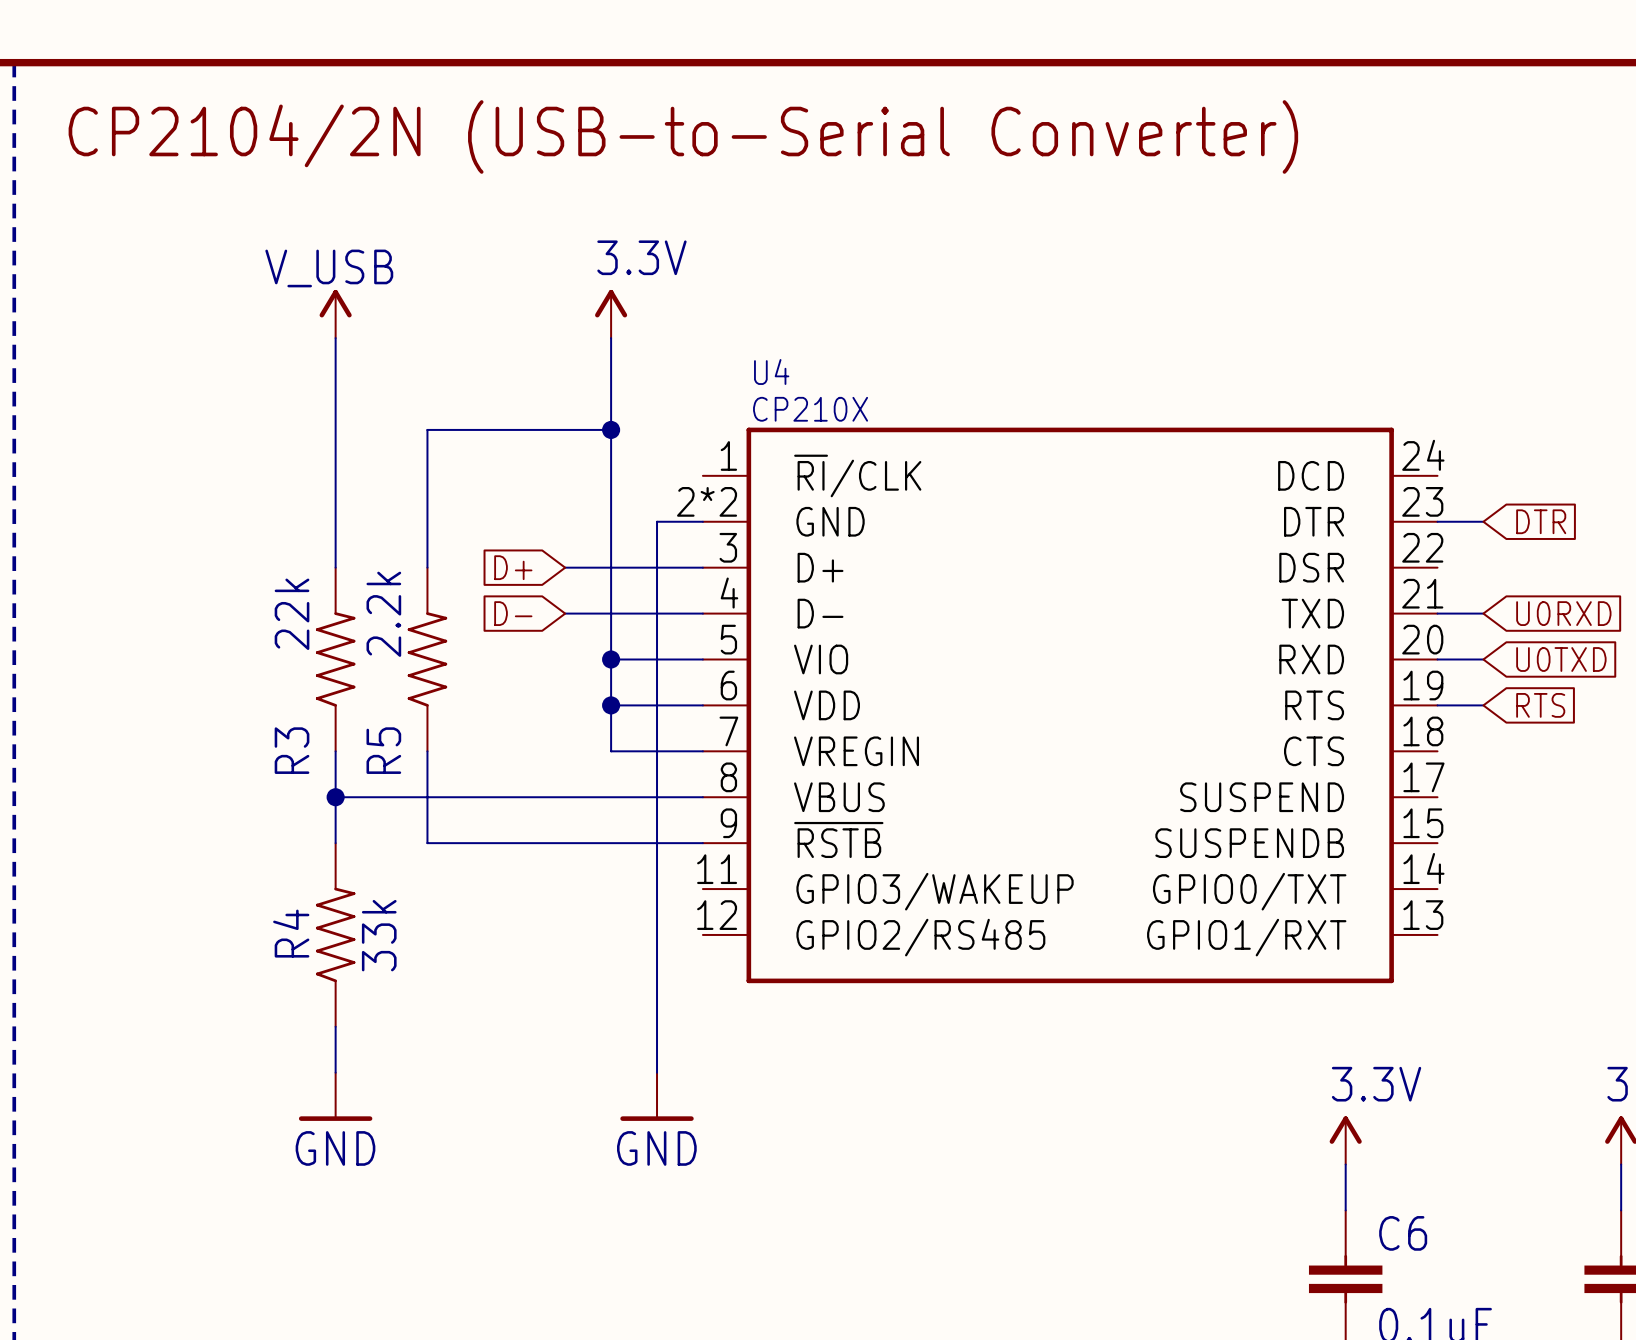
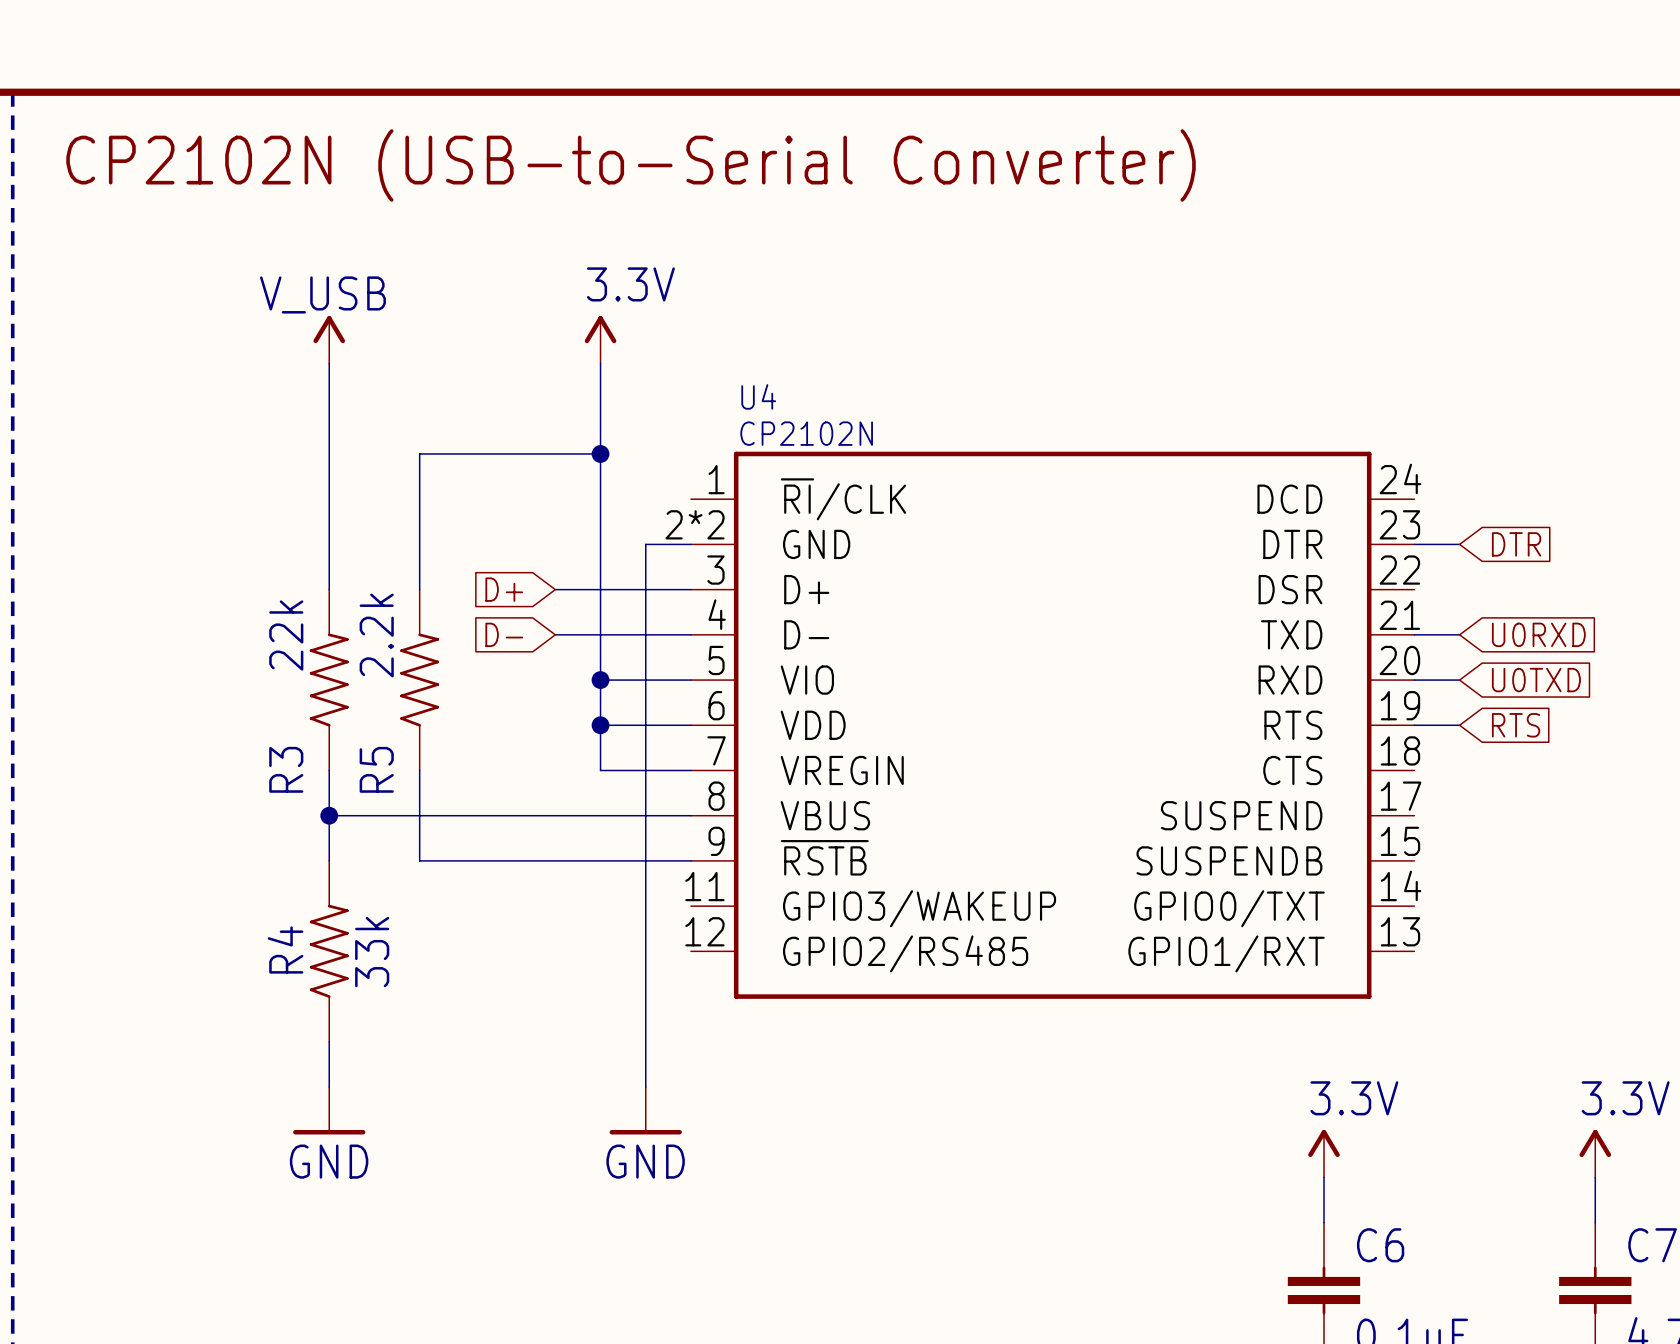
text: CP2104/2N (USB-to-Serial Converter) (683, 136) -> CP2102N (USB-to-Serial Converter) (631, 165)
U4 value: CP210X (810, 409) -> CP2102N (806, 433)

